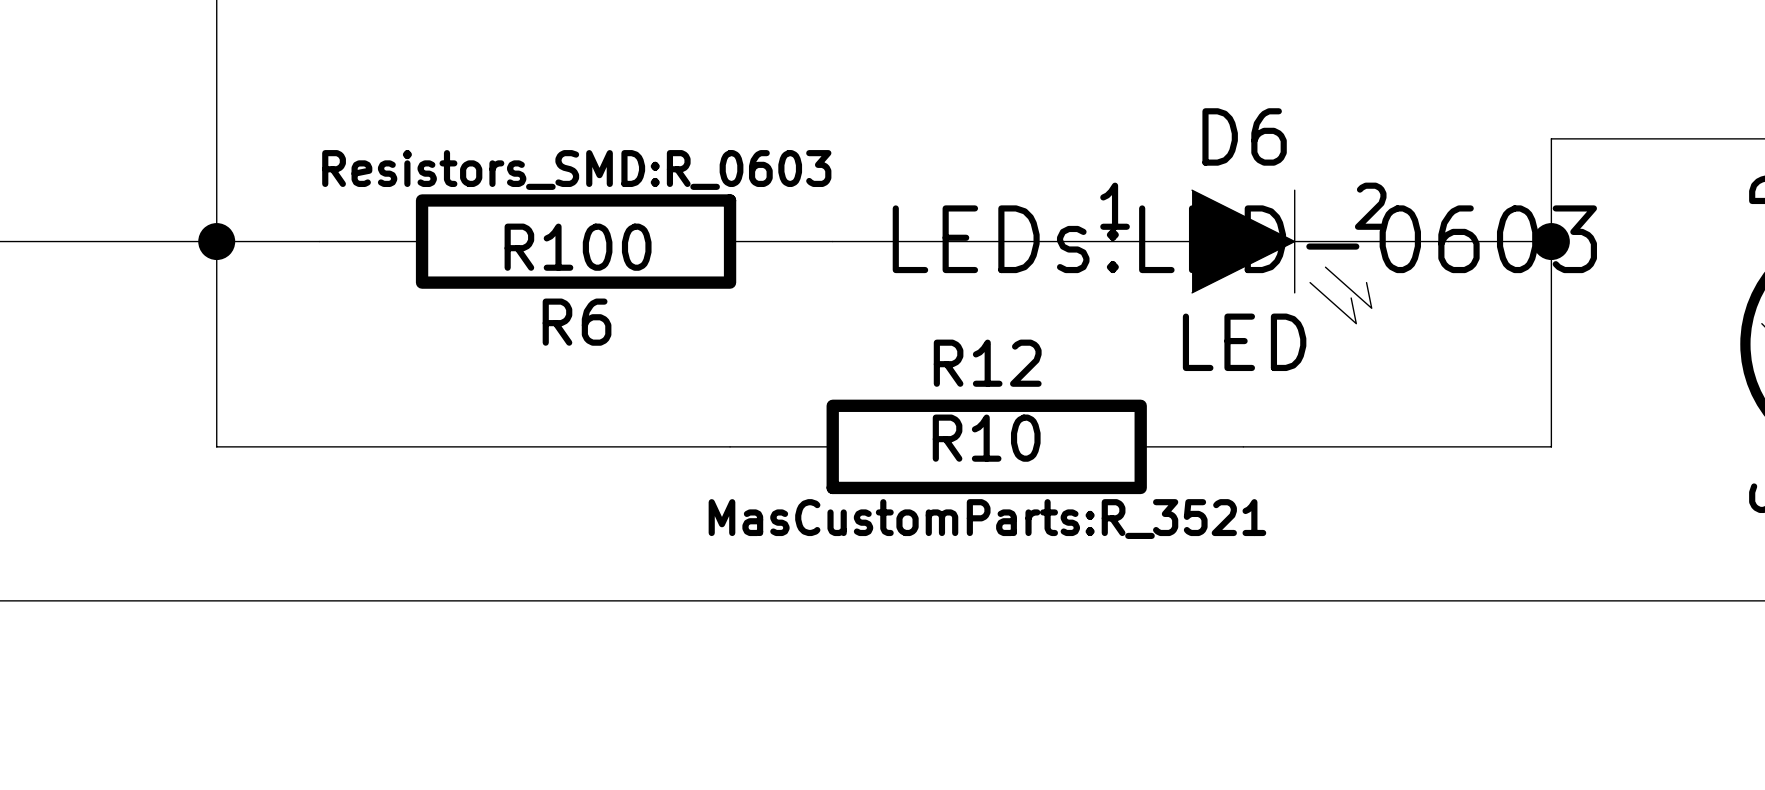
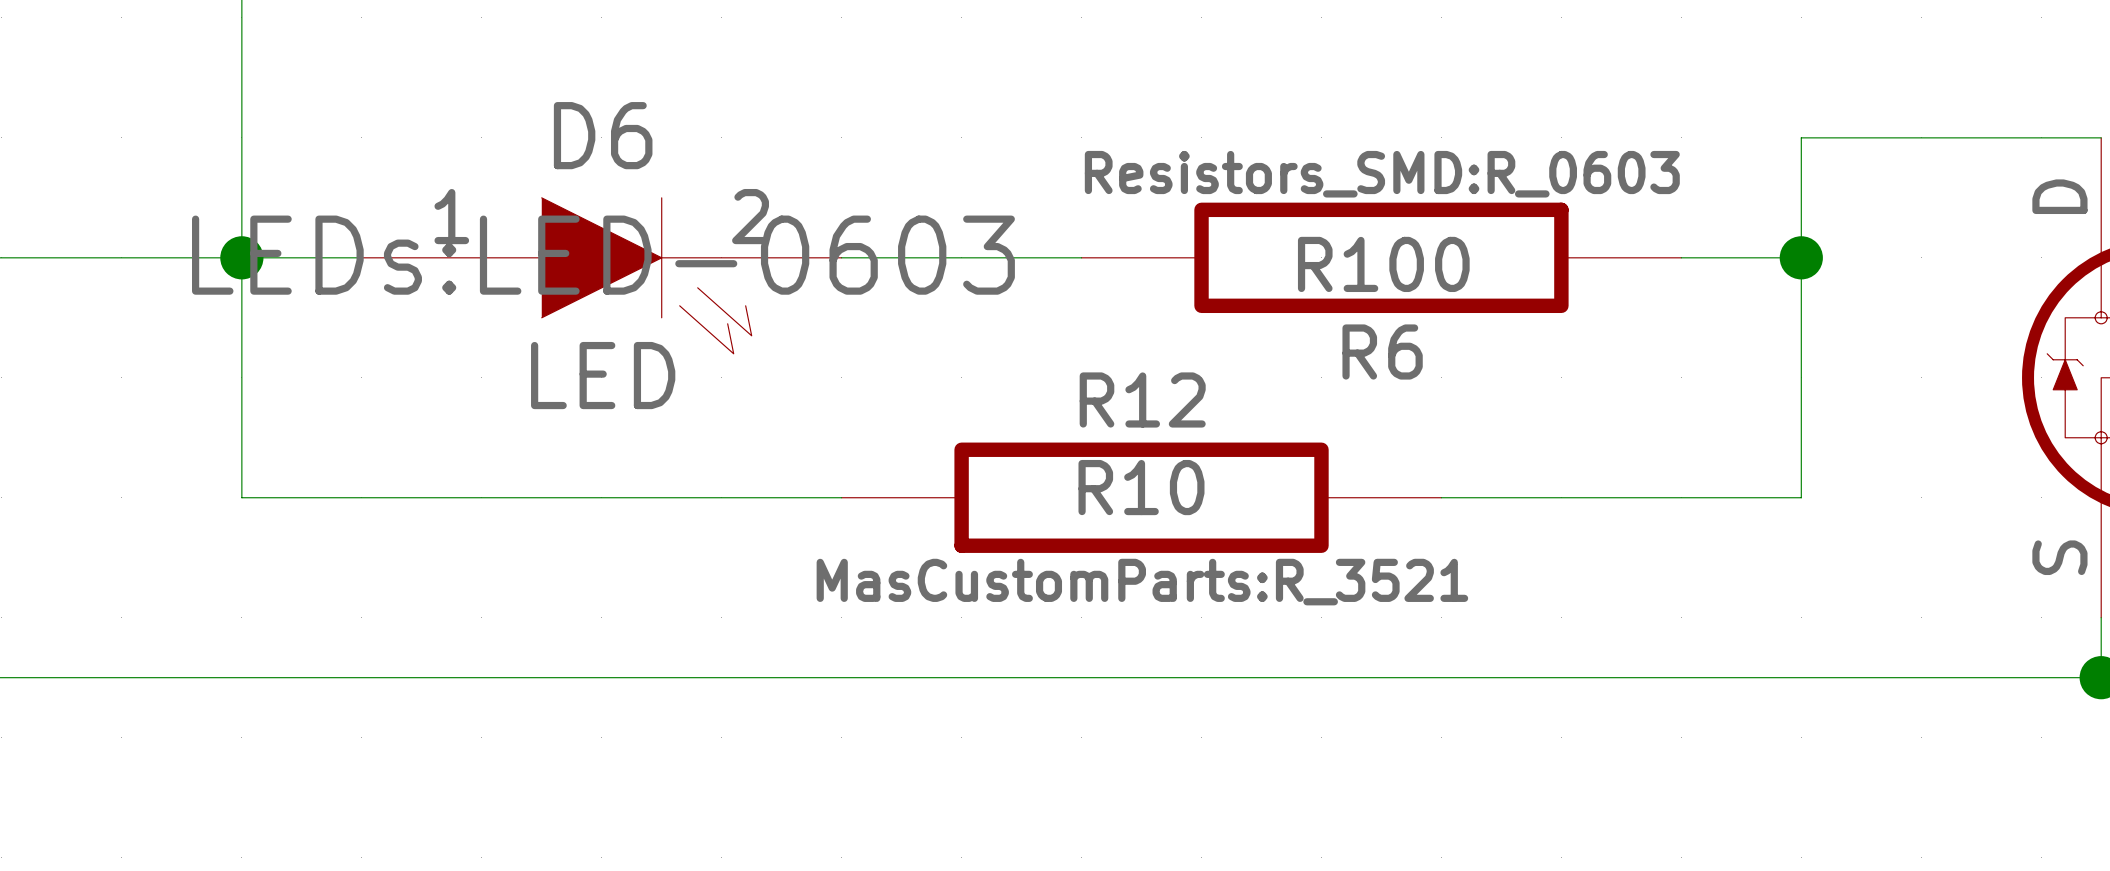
R6 position: (576, 241) -> (1381, 257)
D6 position: (1243, 256) -> (601, 275)

